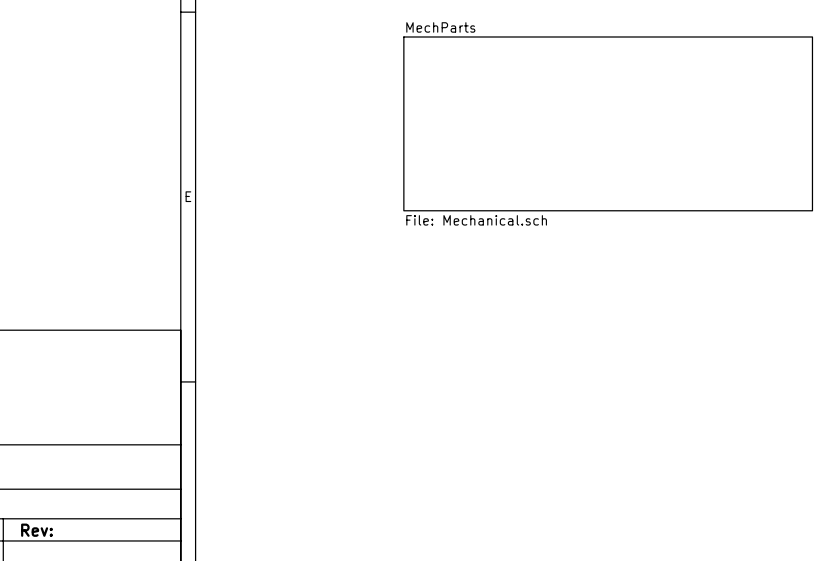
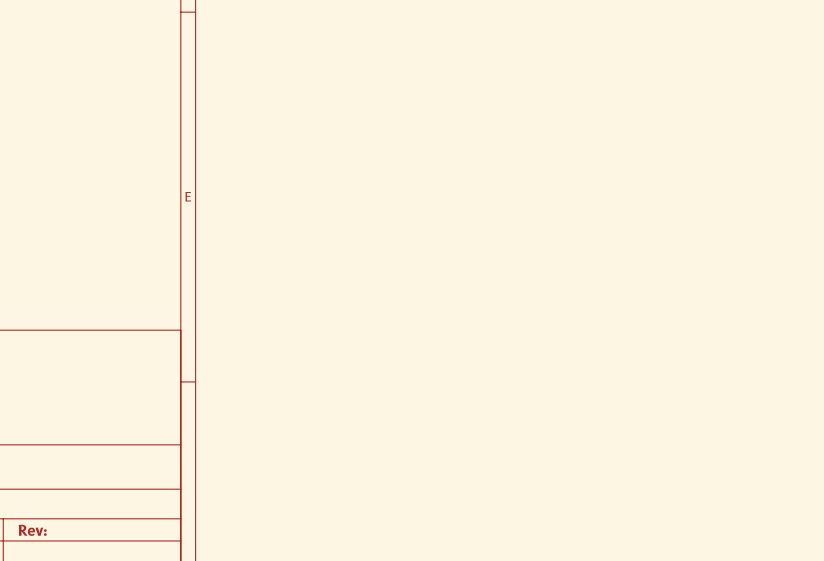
sheet MechParts: File: Mechanical.sch (608, 123) -> none

